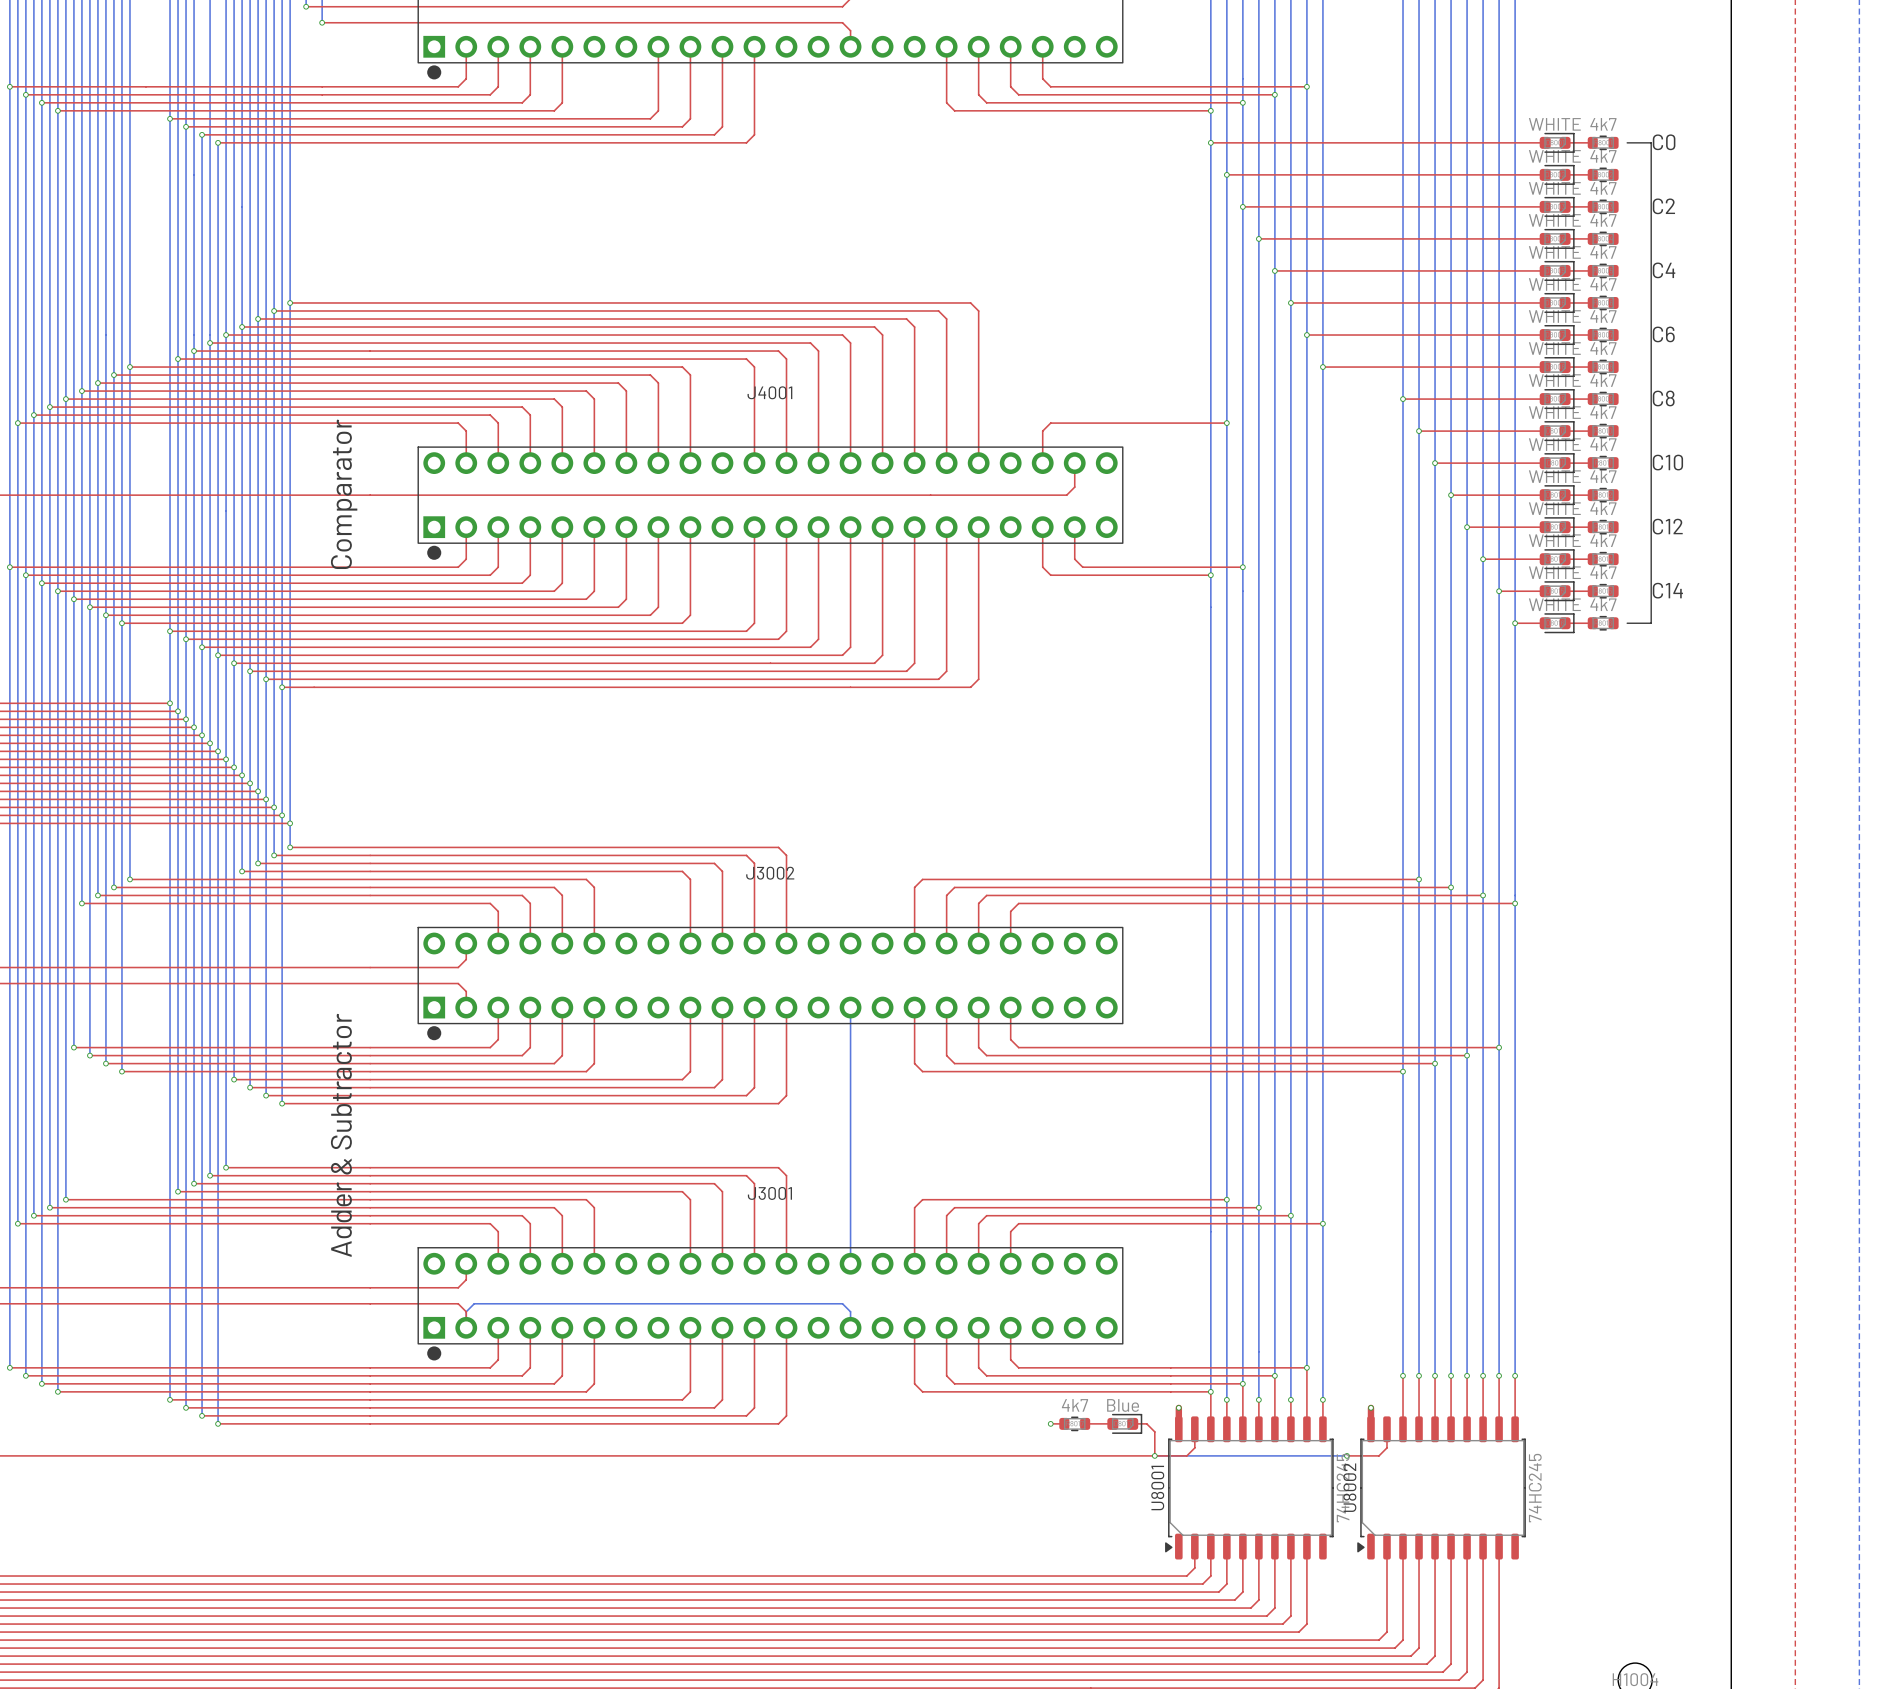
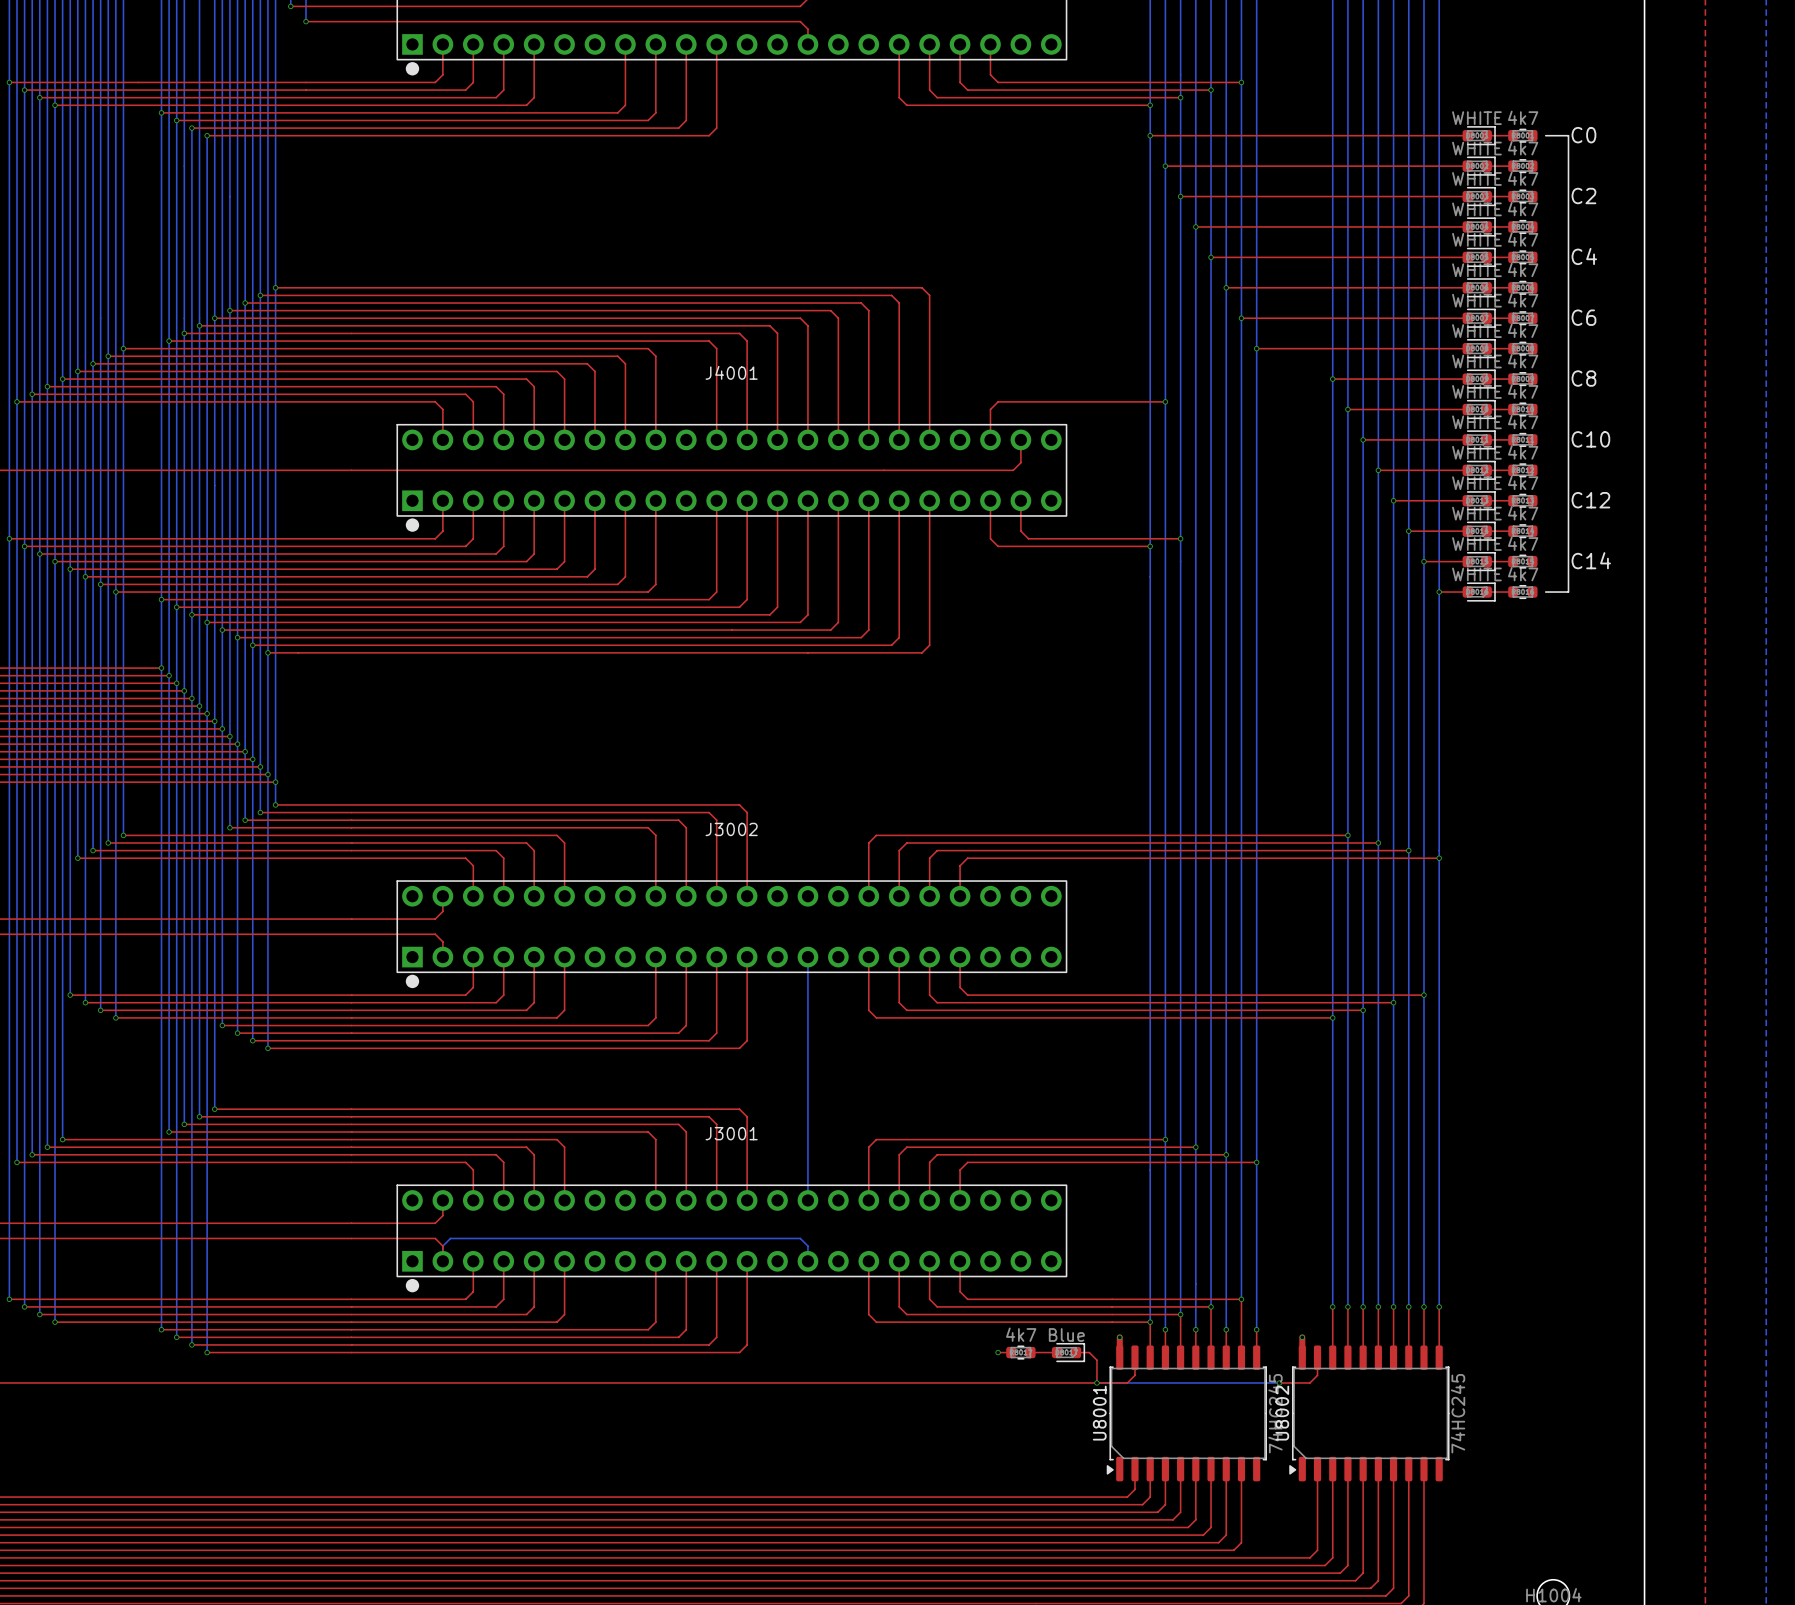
text: Comparator (344, 494) -> none
text: Adder & Subtractor (341, 1135) -> none

